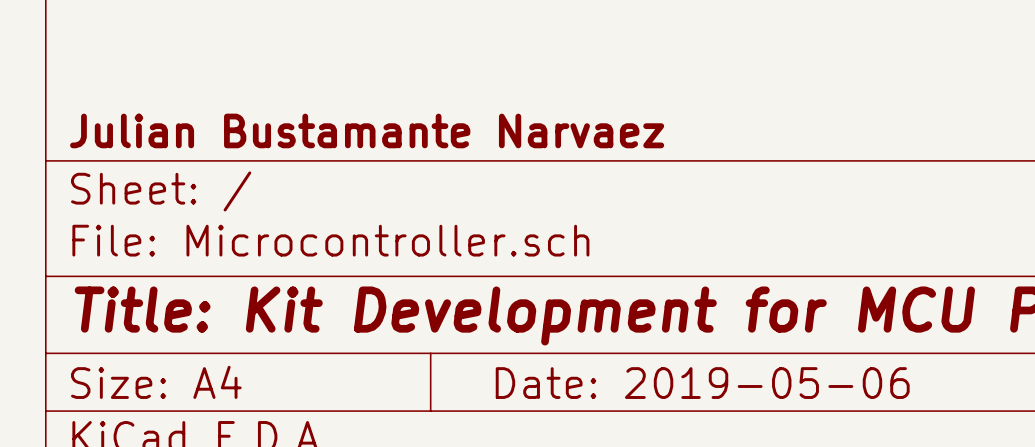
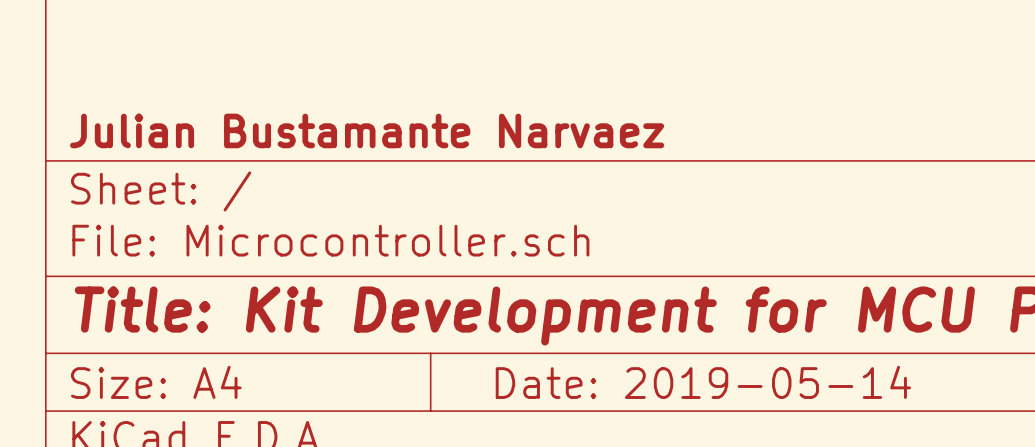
title block: Date: 2019-05-06 (702, 383) -> Date: 2019-05-14 (703, 382)

